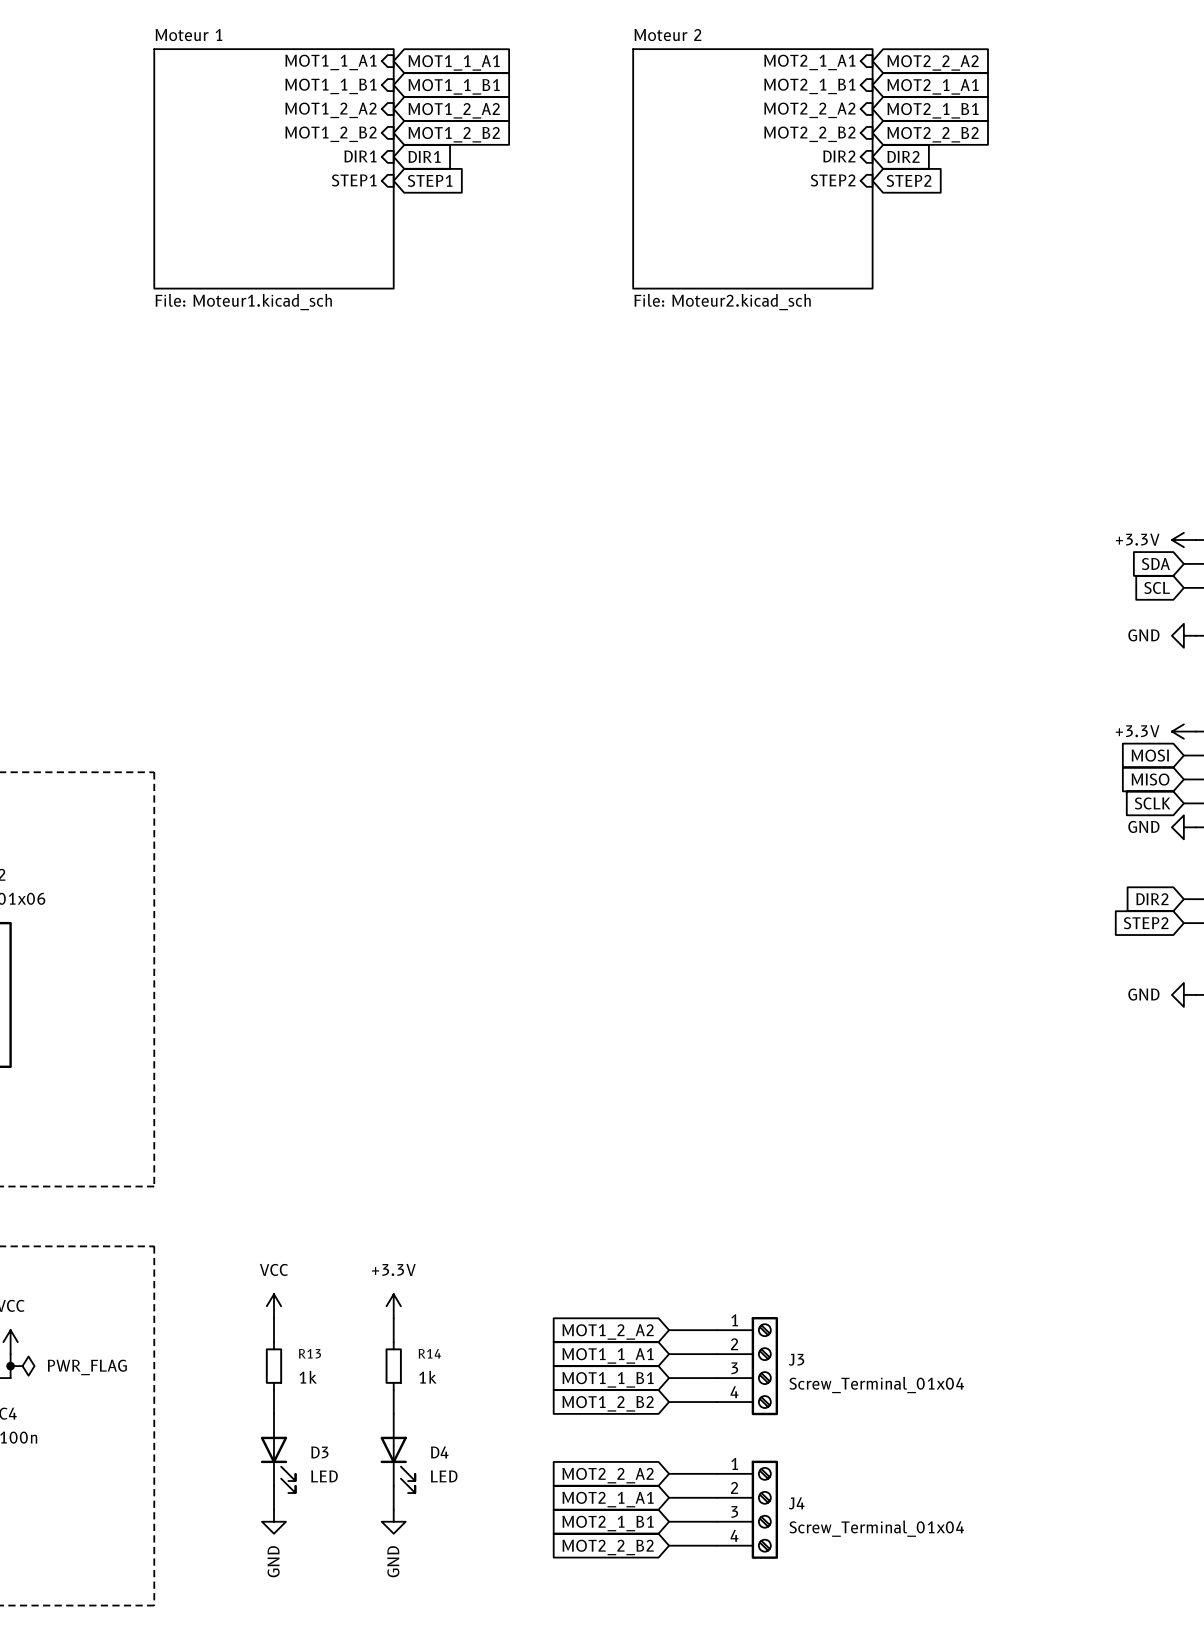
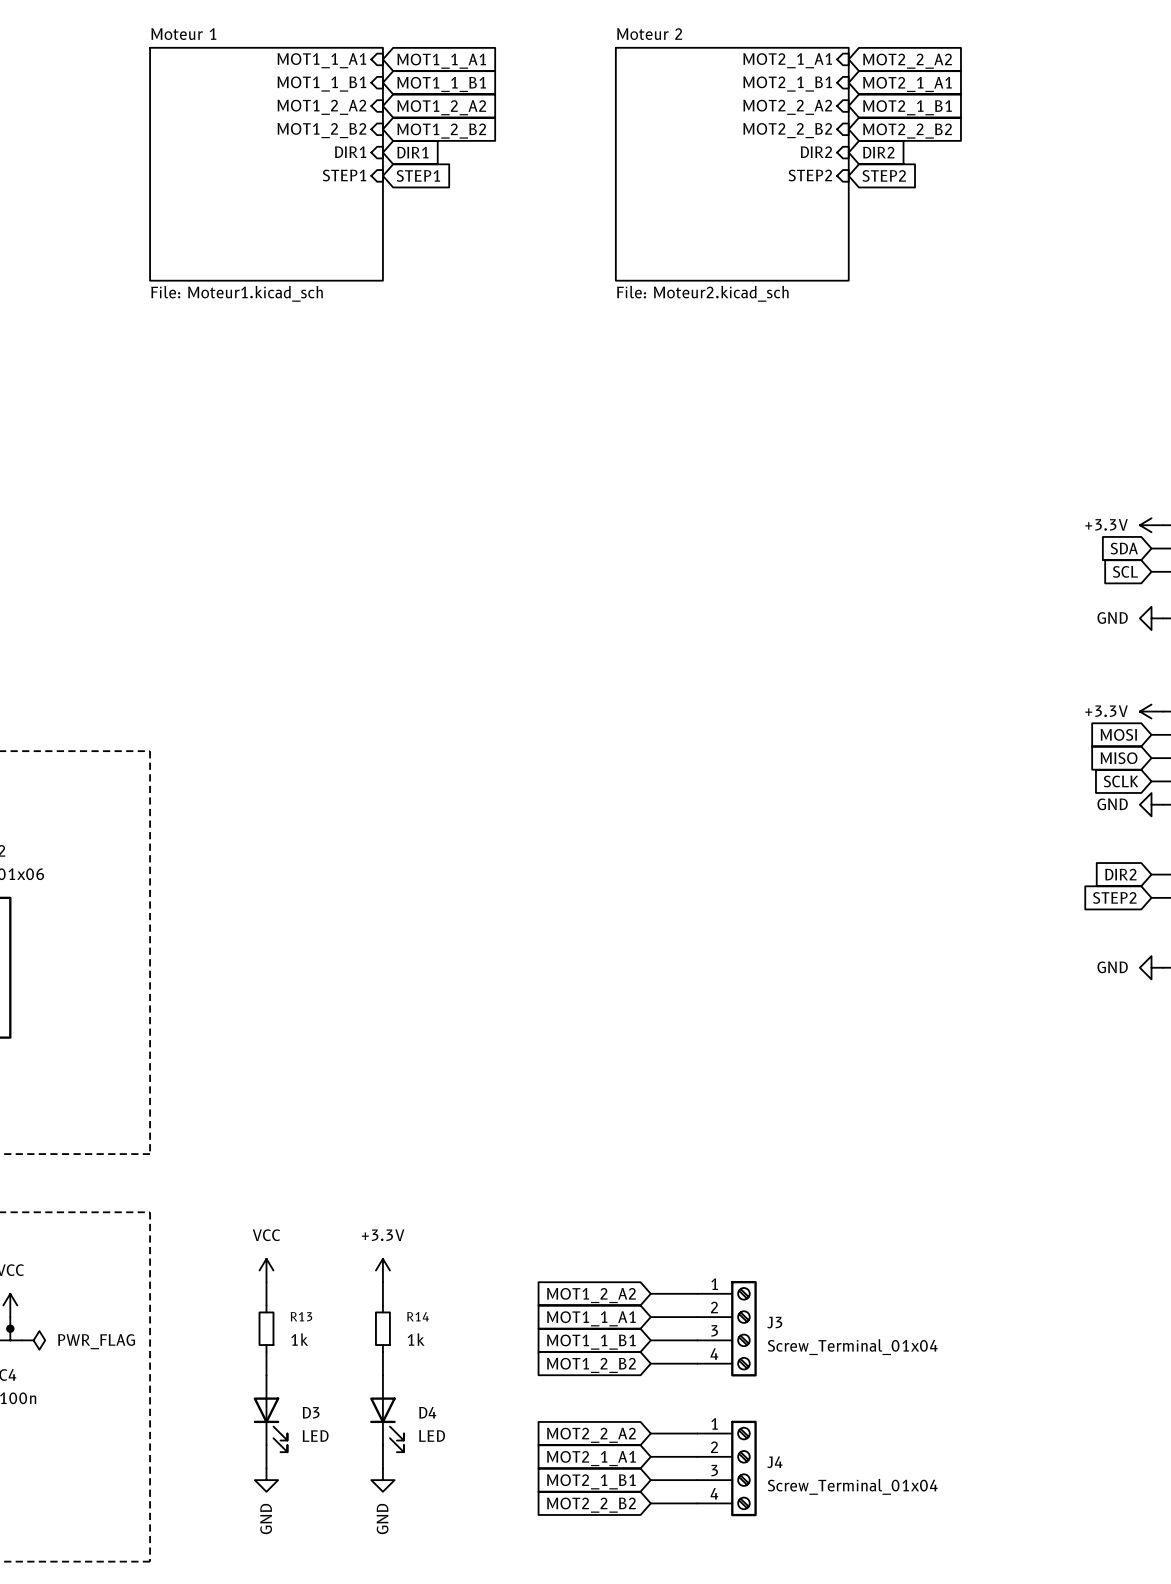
power symbol position: PWR_FLAG (22, 1366) -> PWR_FLAG (33, 1340)
wire: none -> (10, 1340) (21, 1340)

